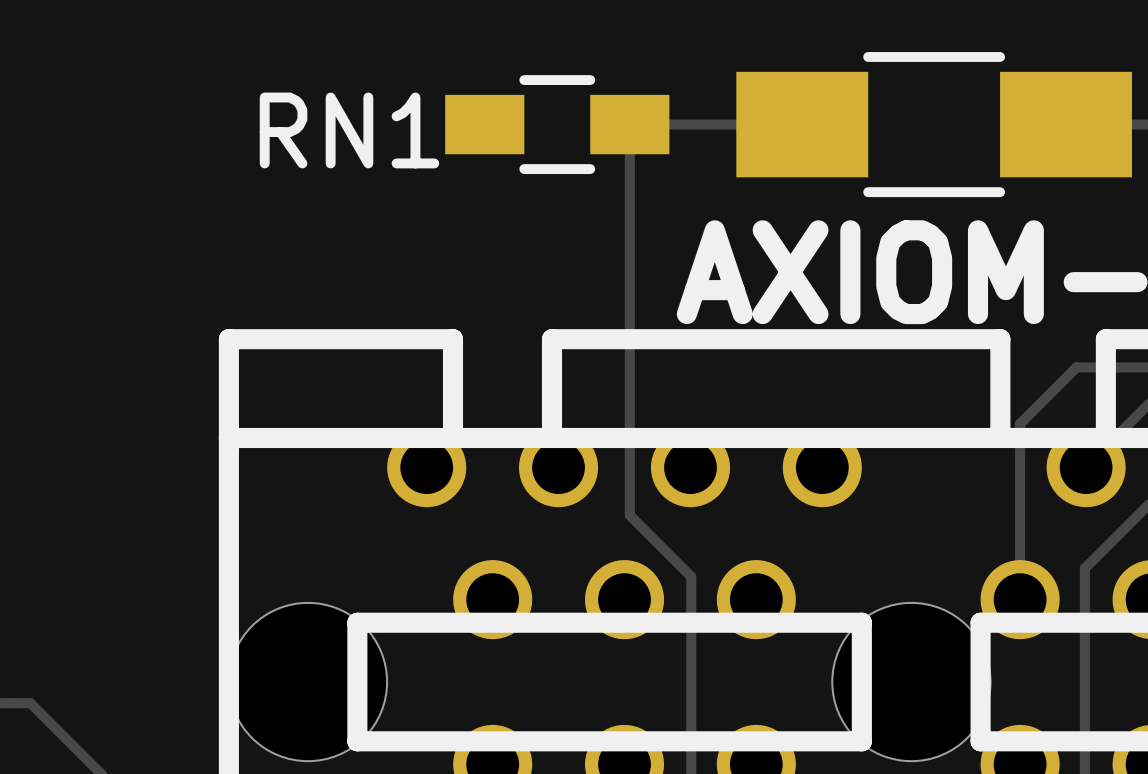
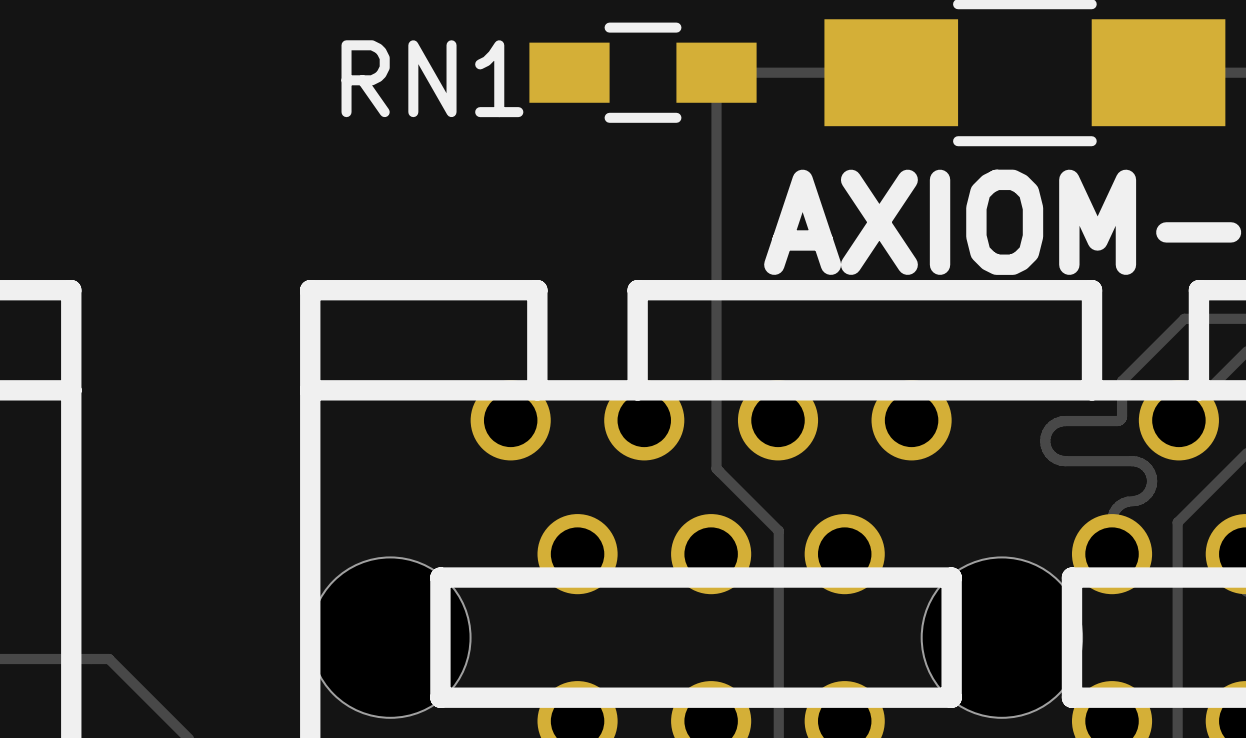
track: (1091, 367) (1076, 367) (1020, 423) (1020, 567) -> (1184, 318) (1122, 381) (1122, 416)
track: none -> (1117, 421) (1060, 421) (1049, 428) (1045, 441) (1049, 453) (1060, 460) (1132, 461) (1140, 463) (1147, 468) (1152, 481) (1147, 493) (1140, 499) (1119, 505) (1114, 512) (1112, 521)

